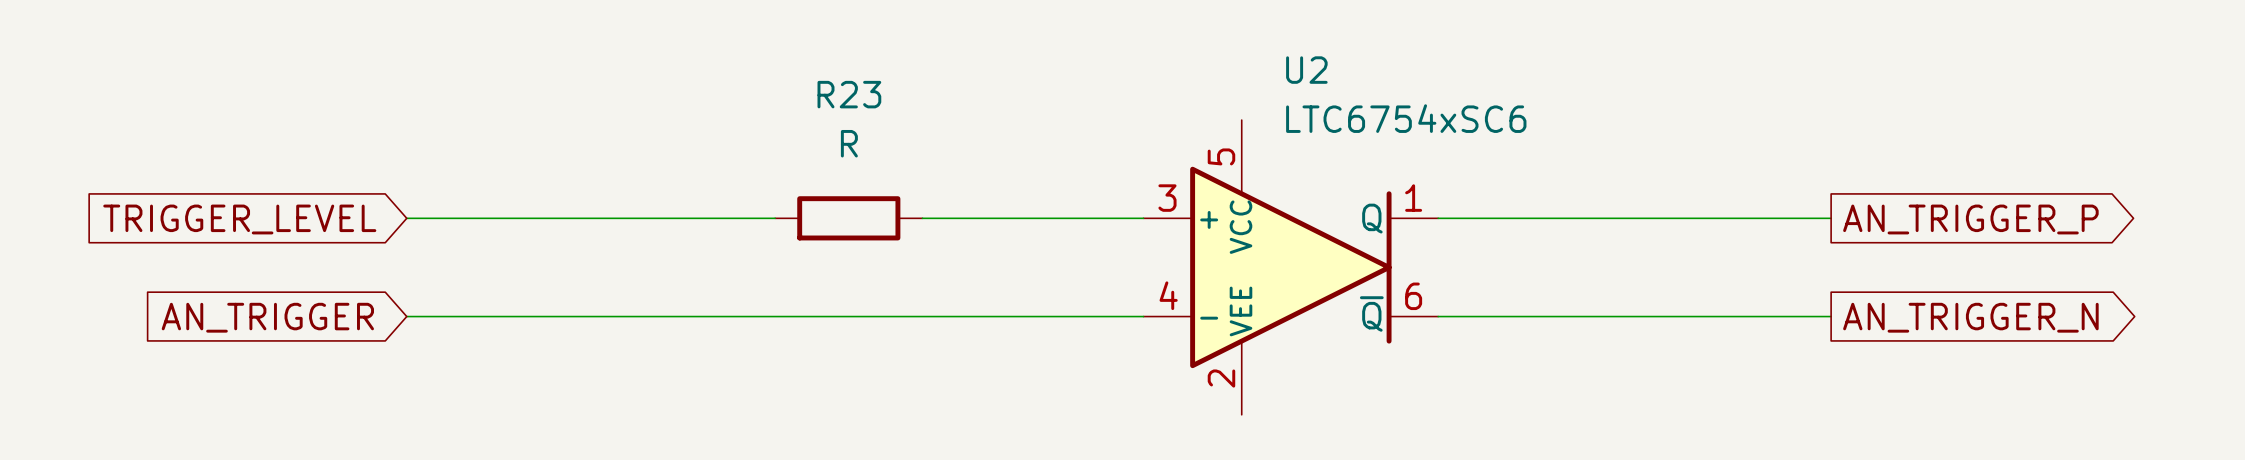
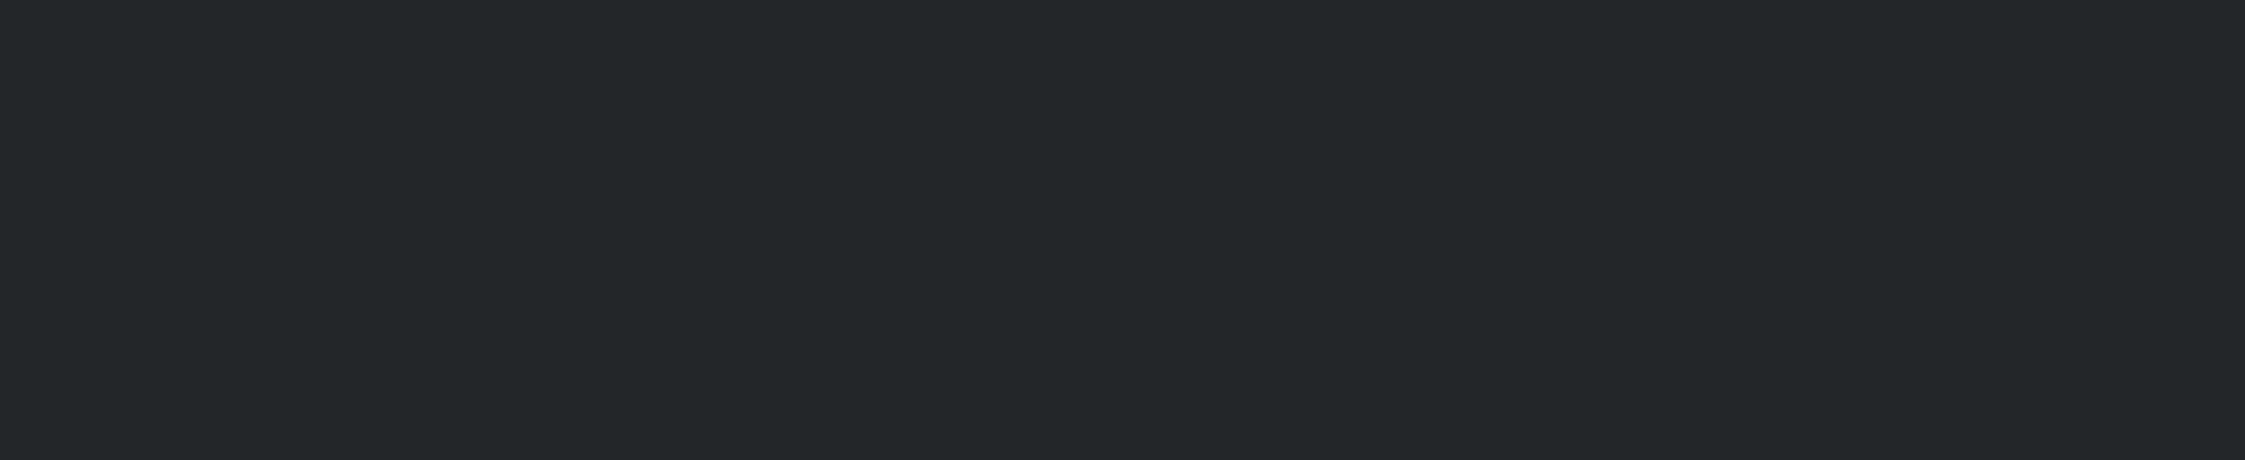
wire: (406, 218) (775, 218) -> none
R23: R (848, 218) -> none
wire: (922, 218) (1143, 218) -> none
wire: (1438, 218) (1831, 218) -> none
global label: TRIGGER_LEVEL (239, 219) -> none
global label: AN_TRIGGER_P (1970, 219) -> none
U2: LTC6754xSC6 (1290, 267) -> none
wire: (406, 316) (1143, 316) -> none
wire: (1438, 316) (1831, 316) -> none
global label: AN_TRIGGER (267, 317) -> none
global label: AN_TRIGGER_N (1970, 317) -> none

